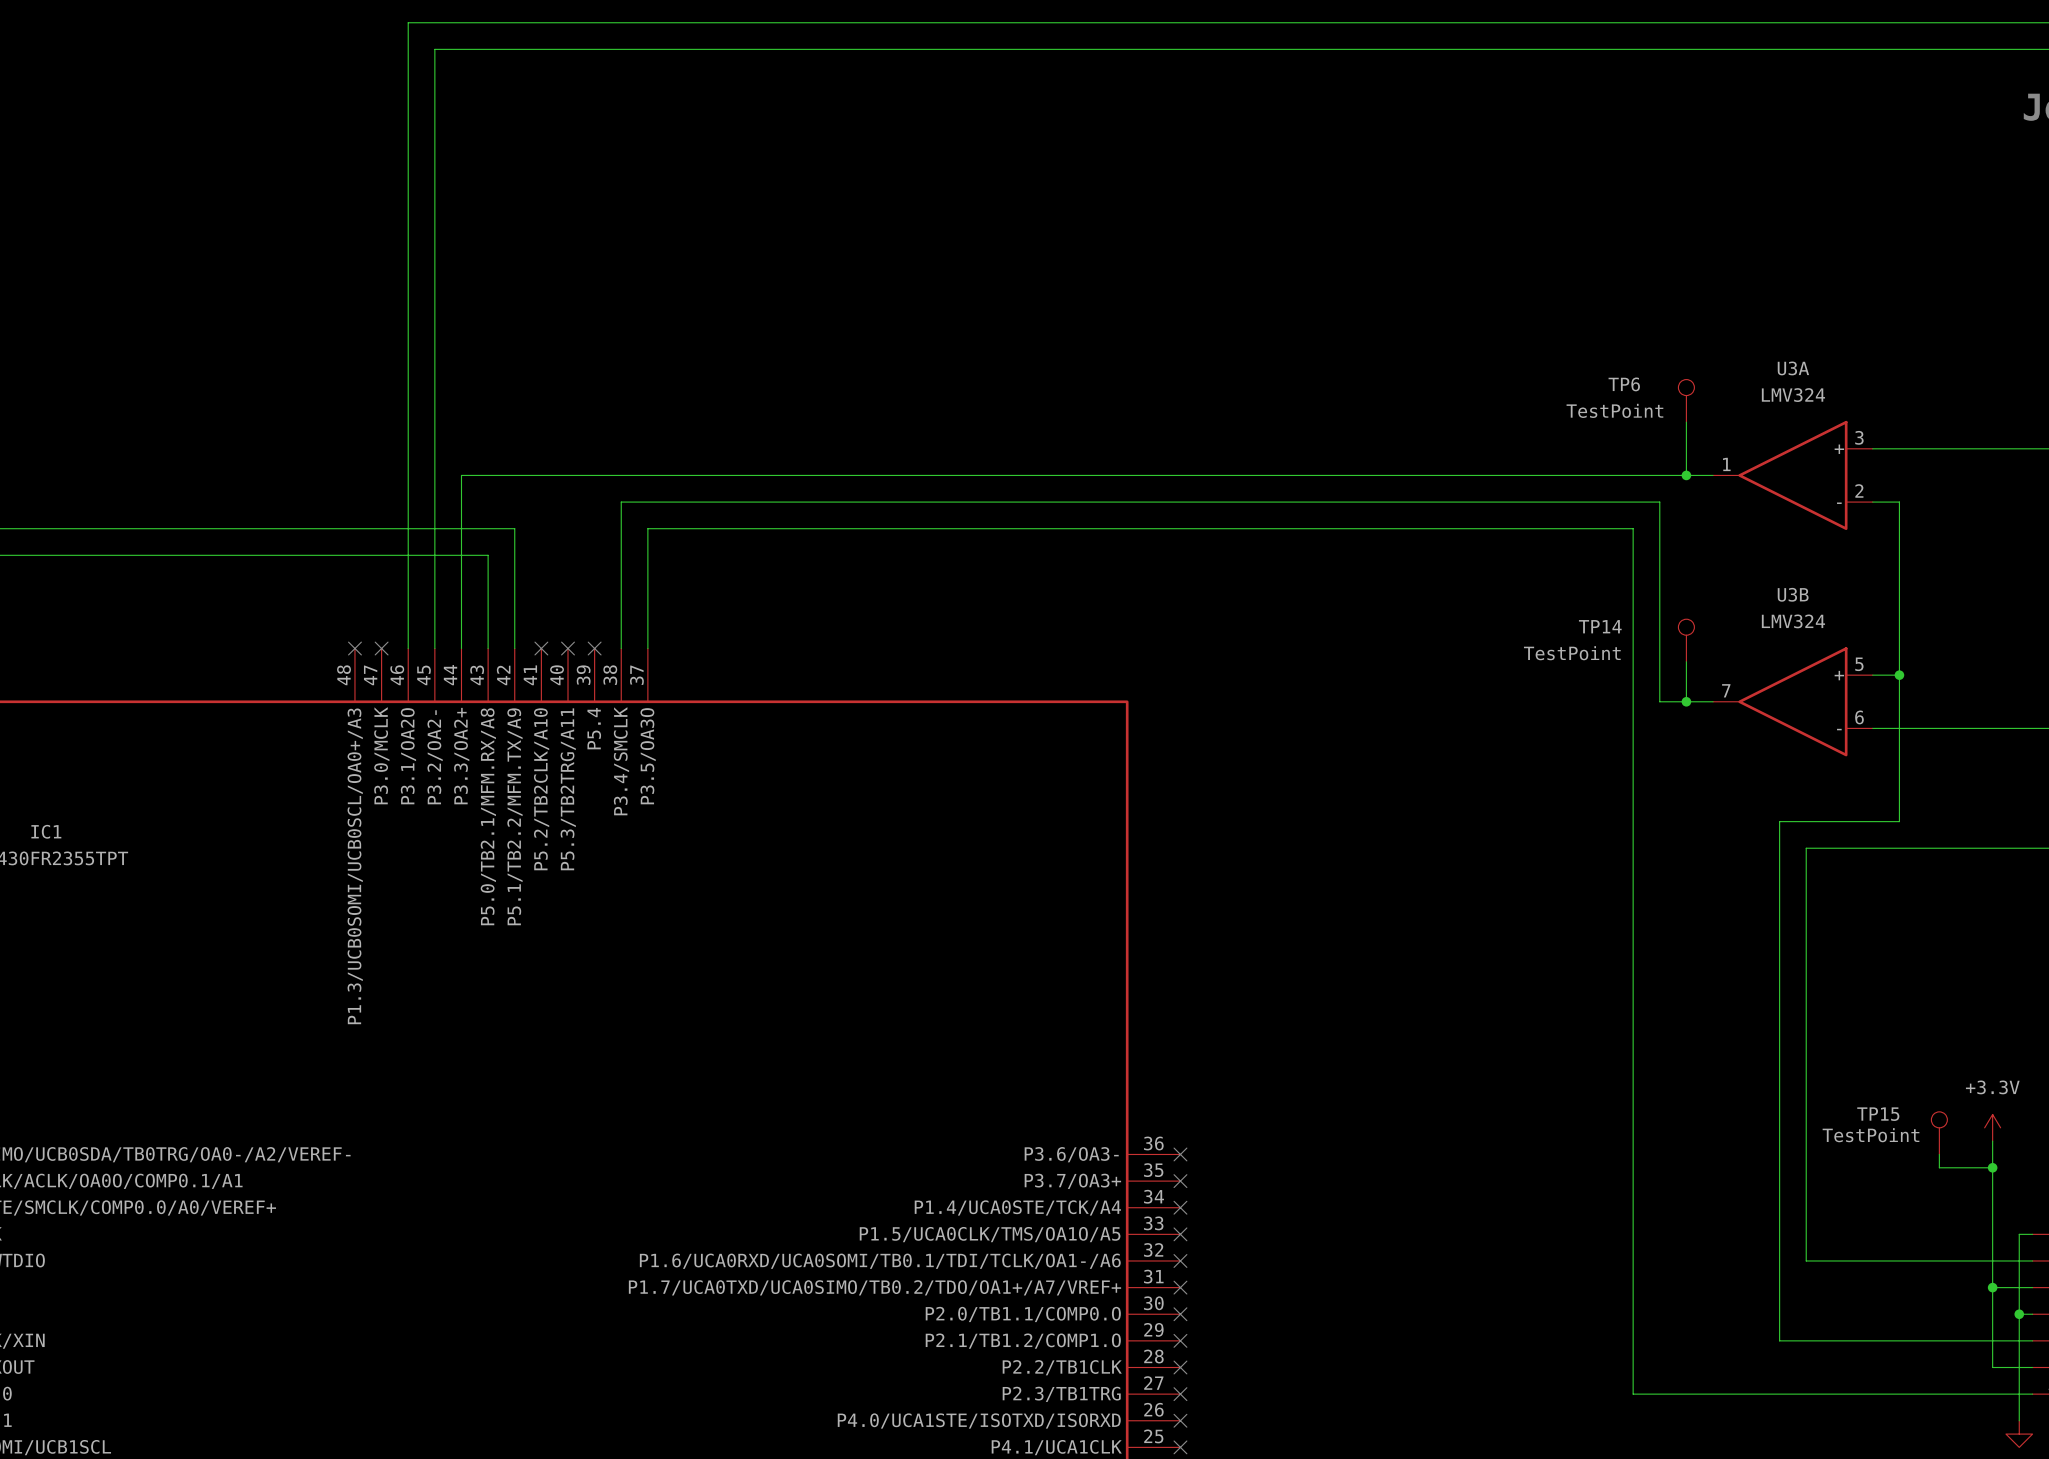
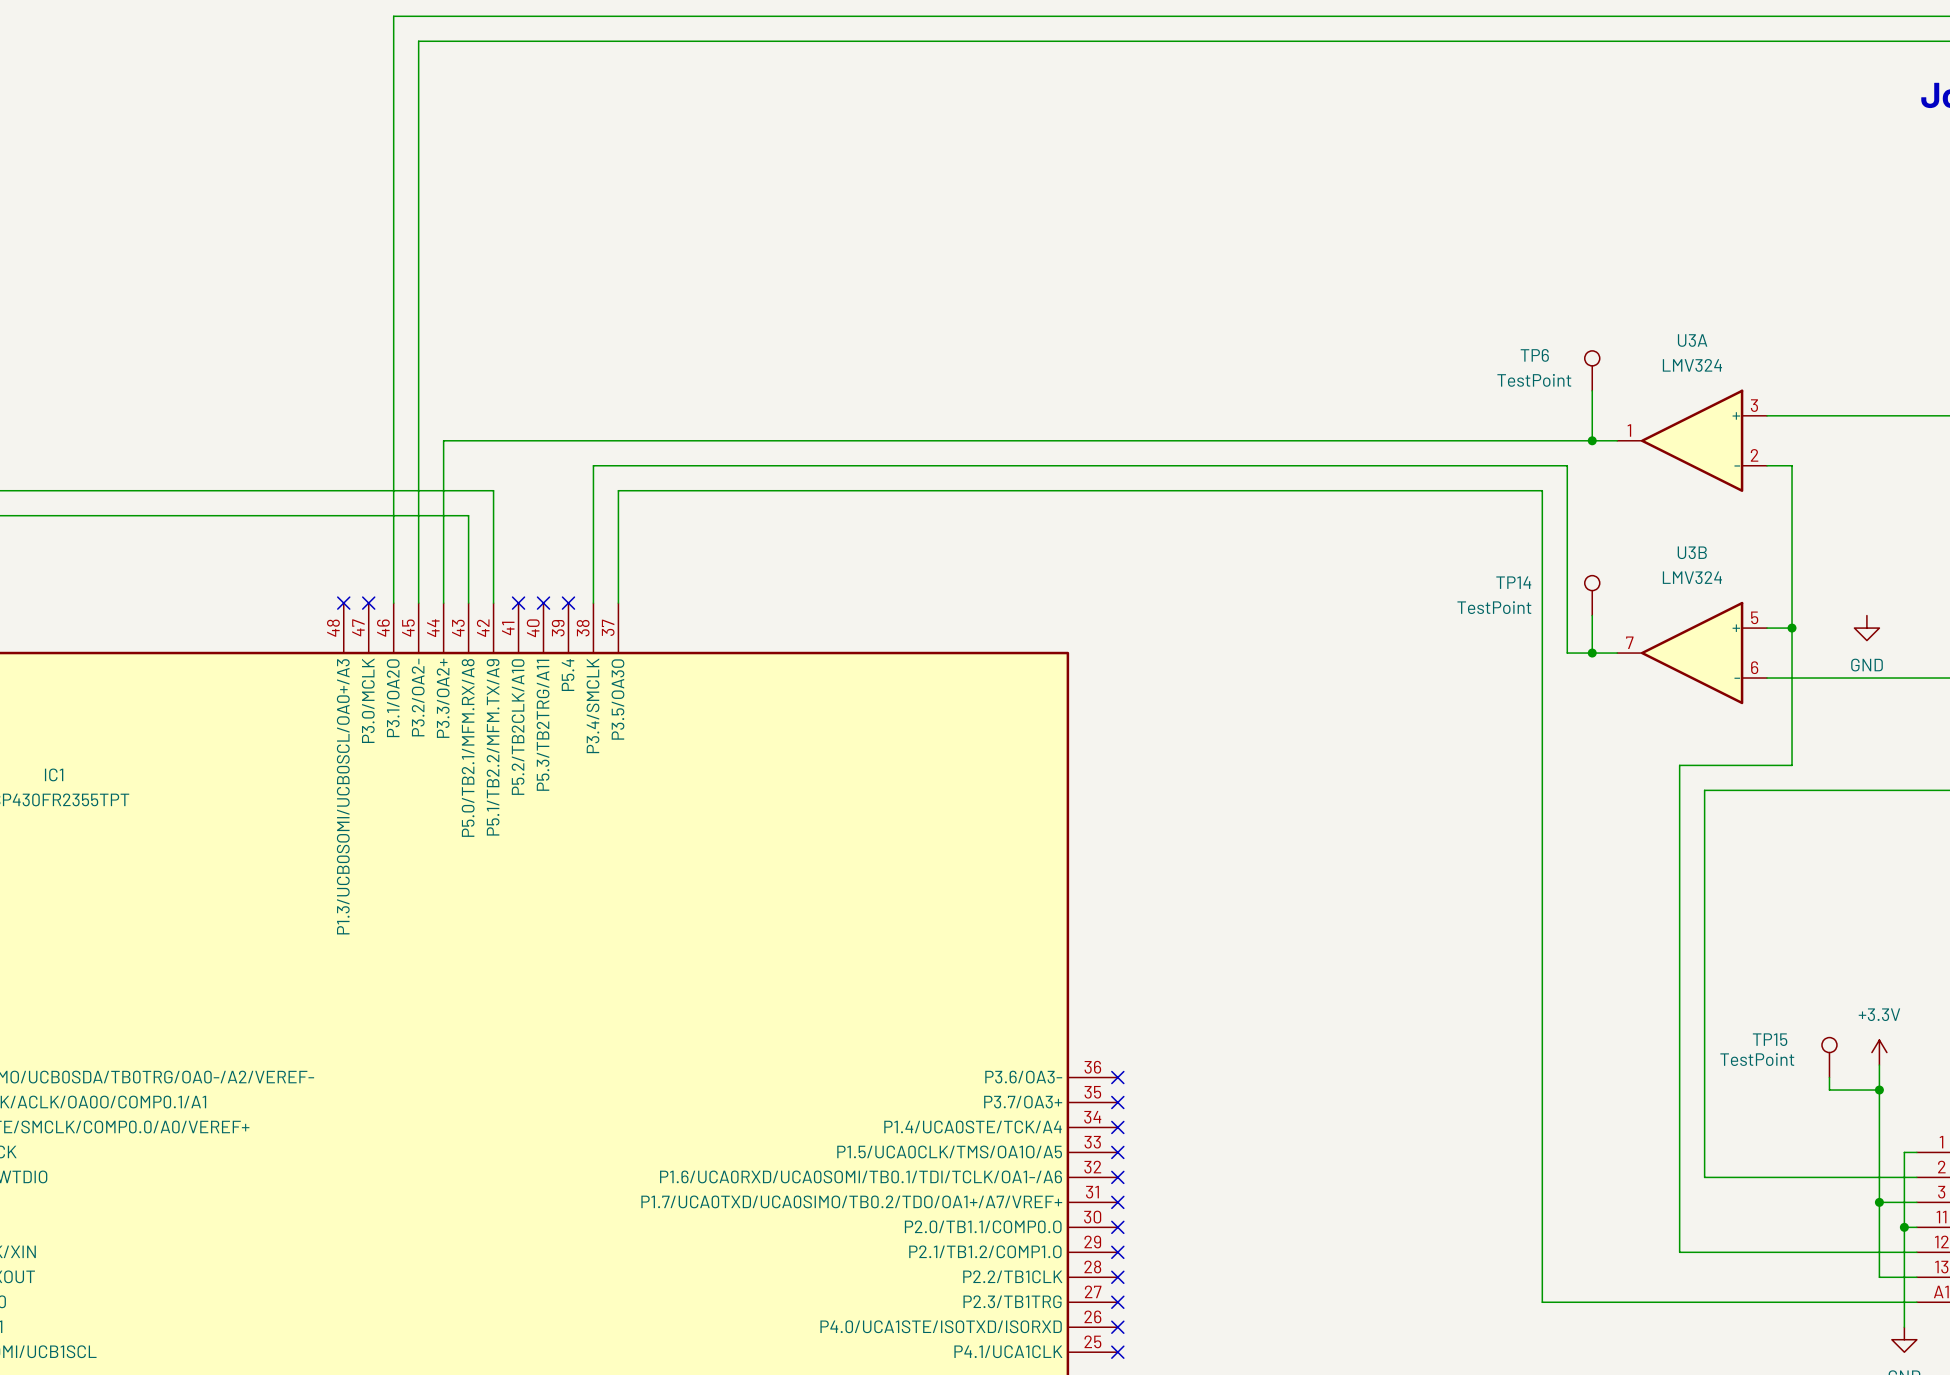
power symbol: none -> GND (1866, 628)

